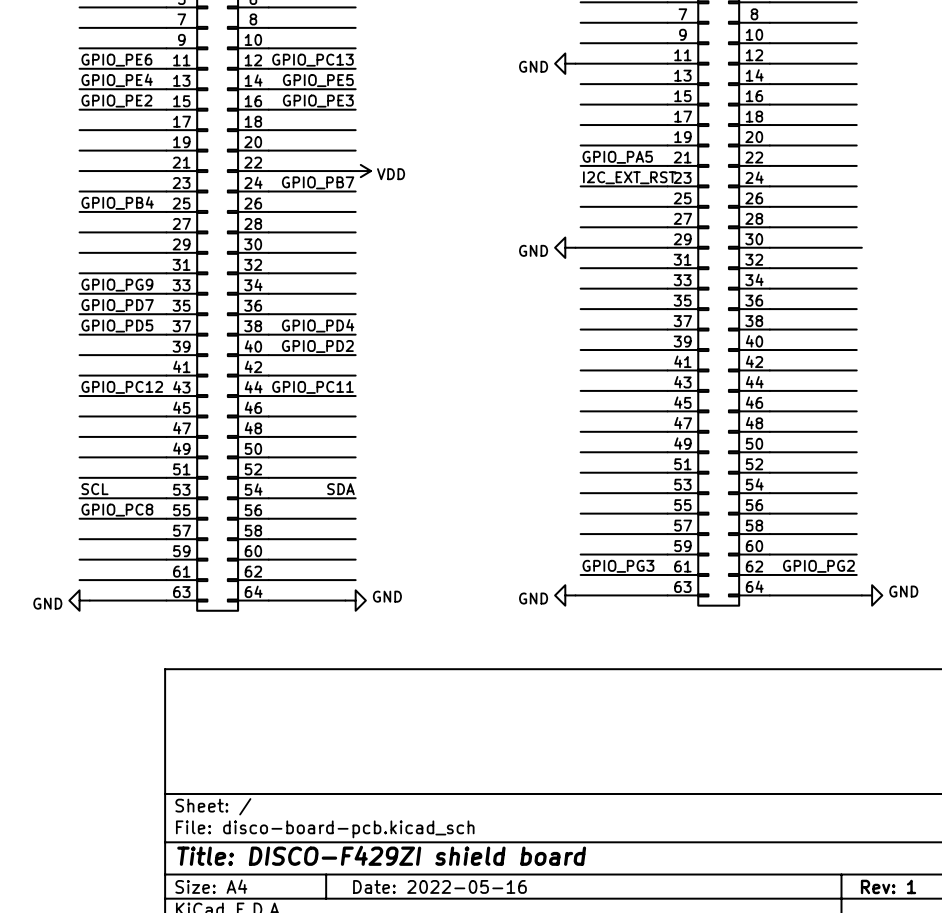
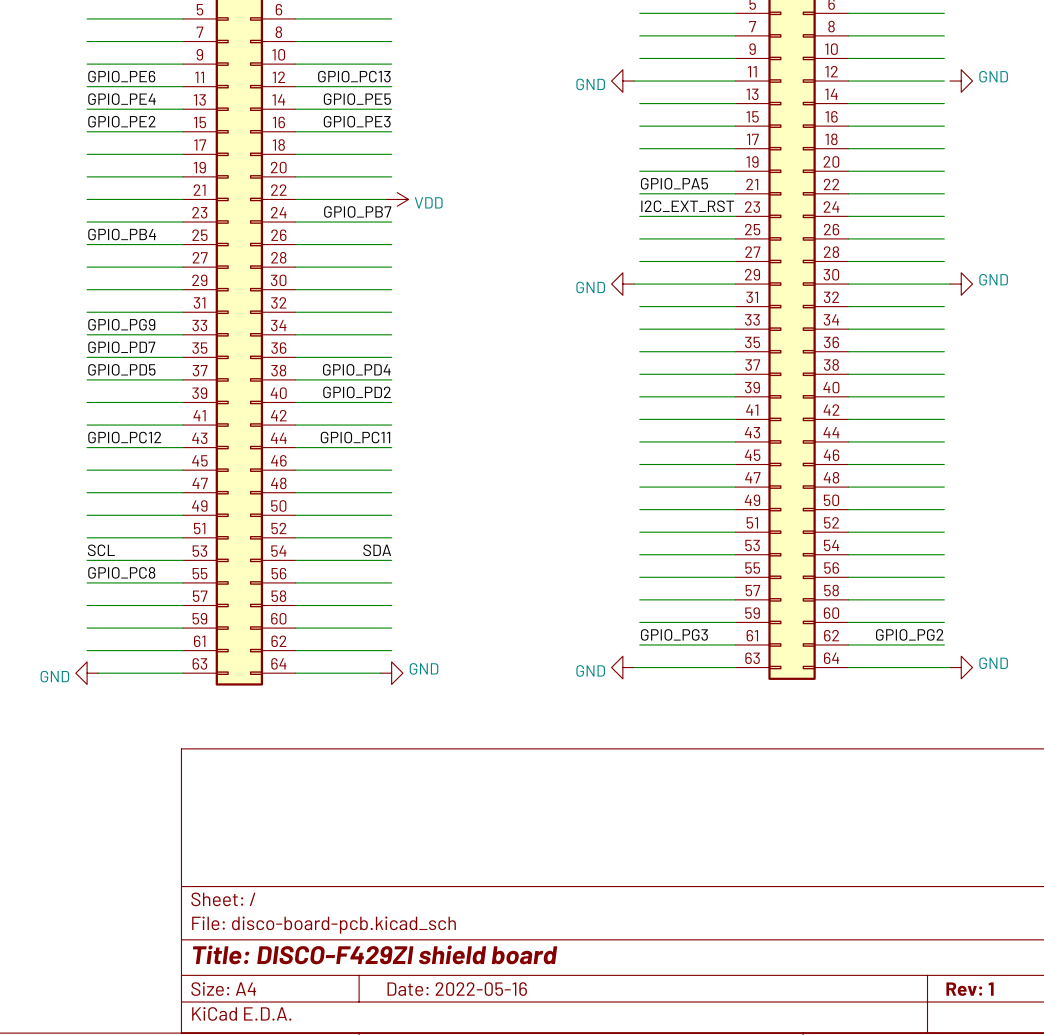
power symbol: none -> GND (961, 81)
power symbol: none -> GND (961, 284)

